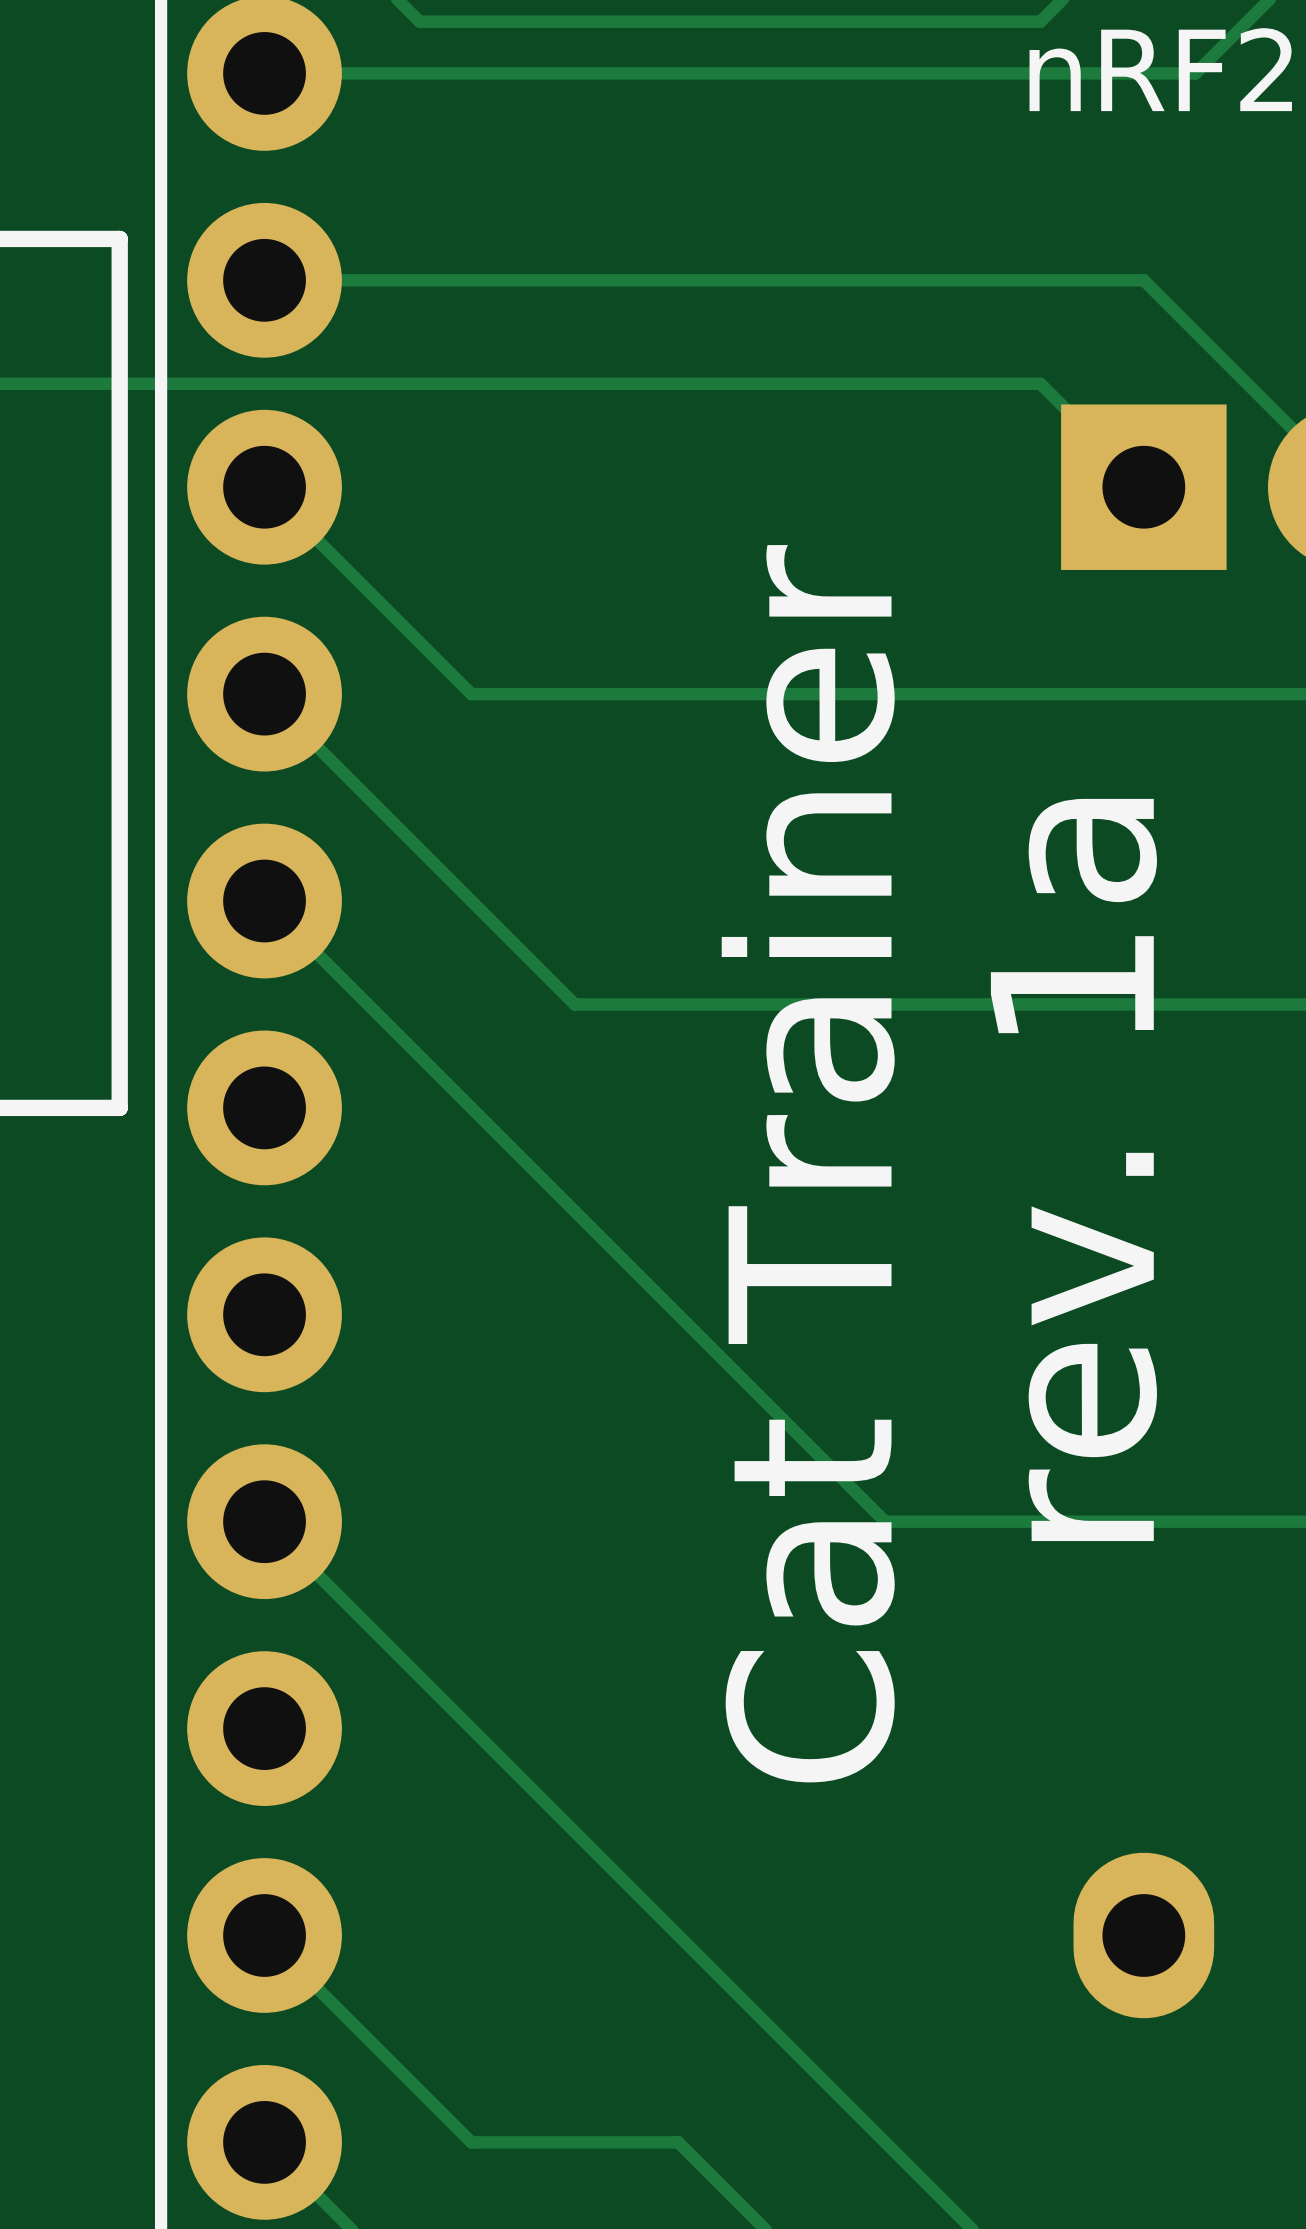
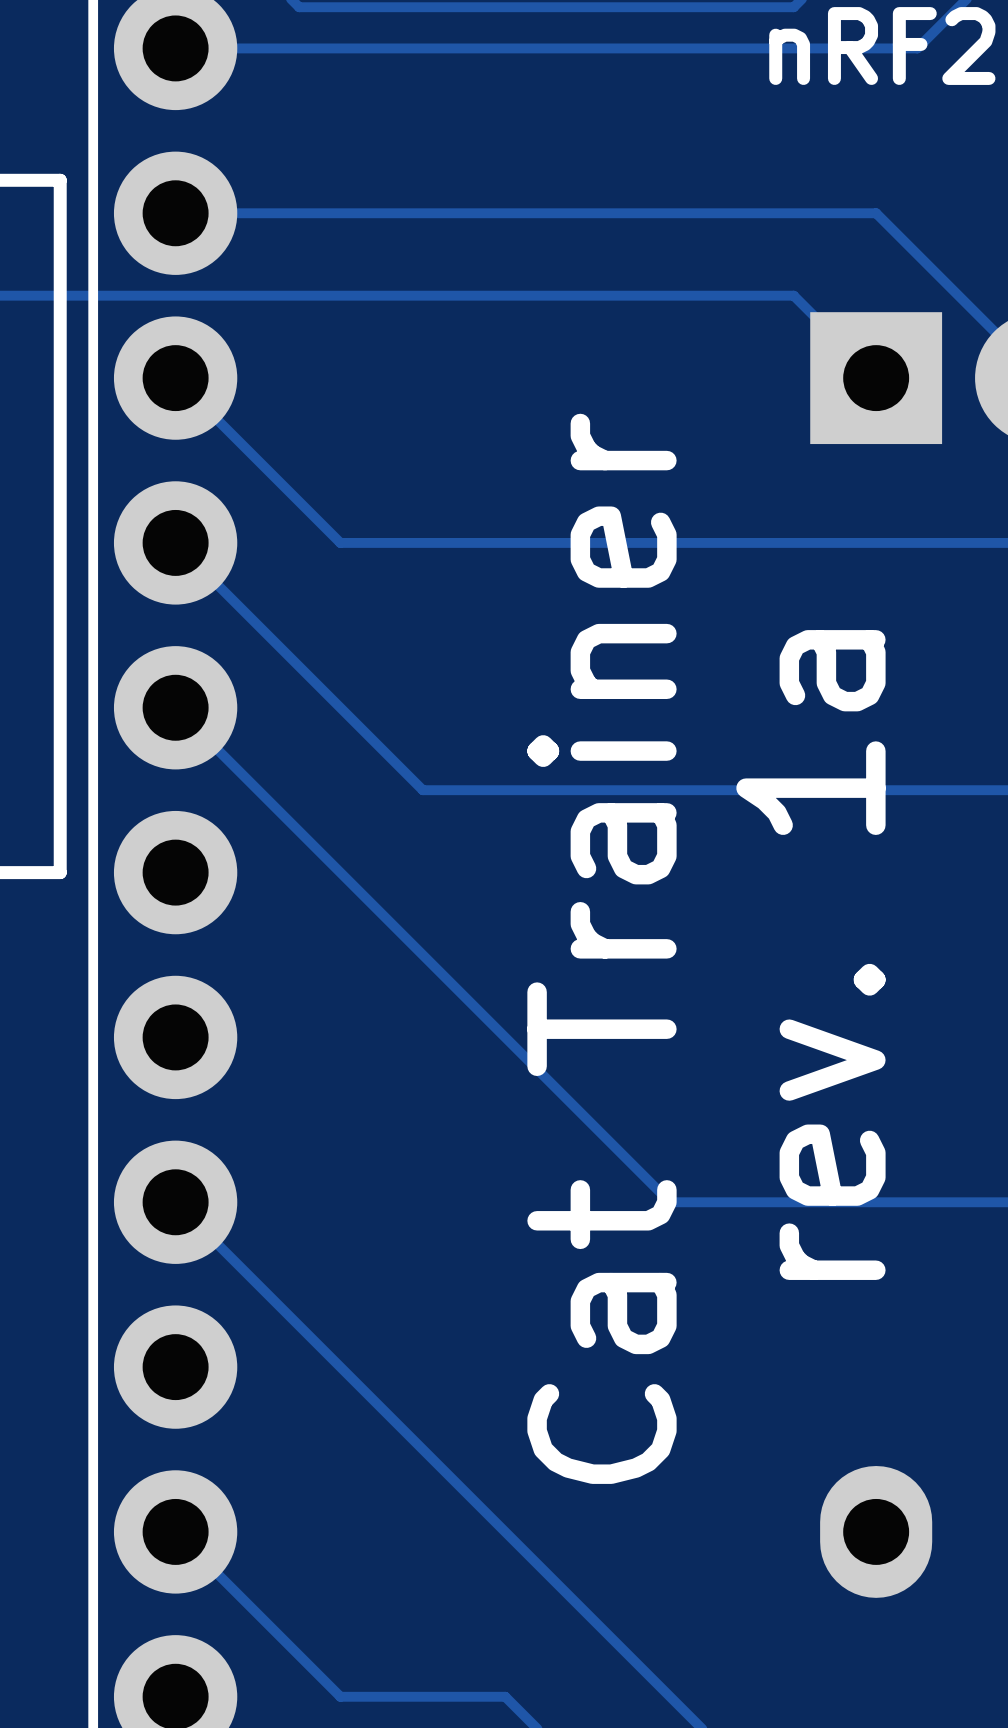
text position: Cat Trainer (808, 1163) -> Cat Trainer (601, 948)
text position: rev. 1a (1073, 1169) -> rev. 1a (810, 955)

